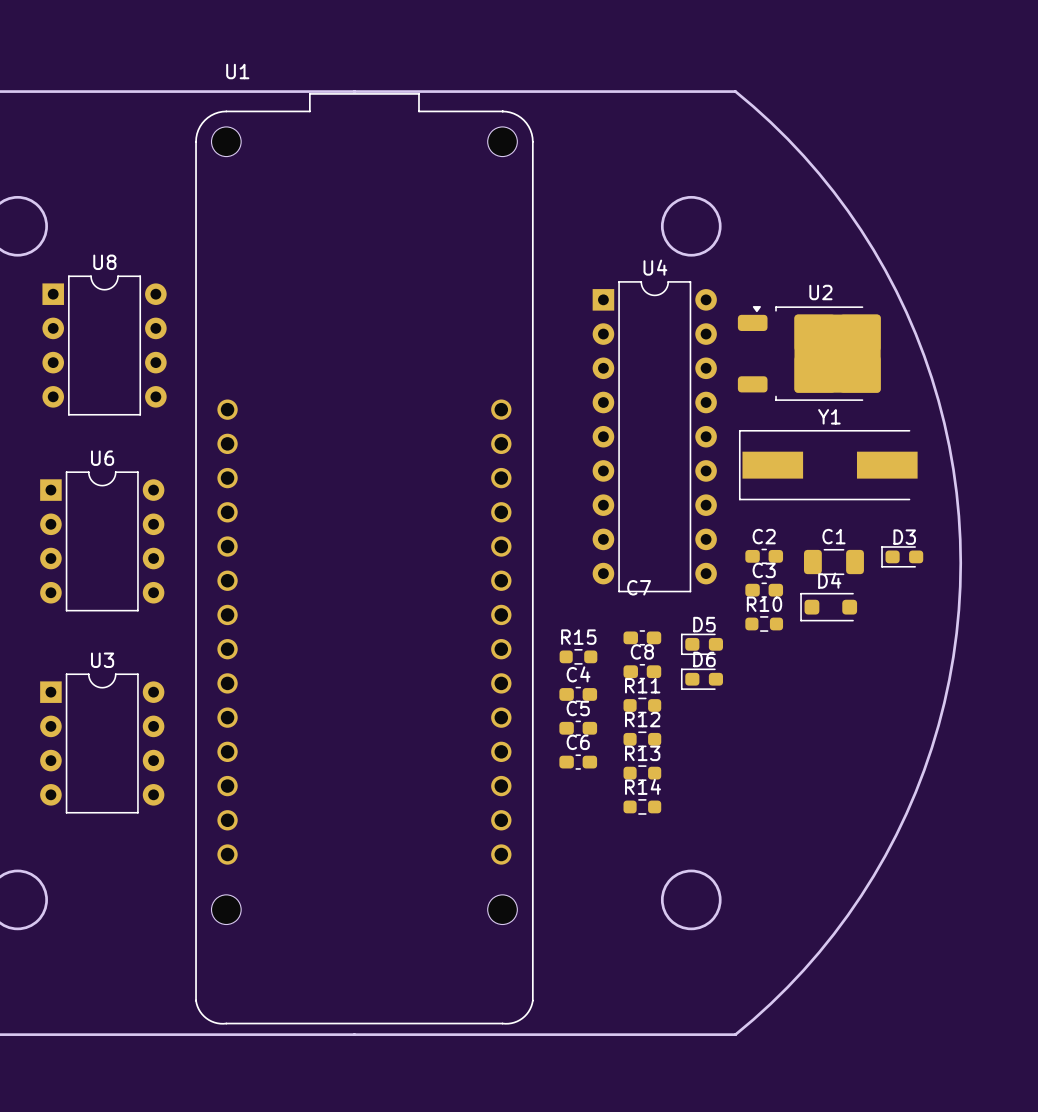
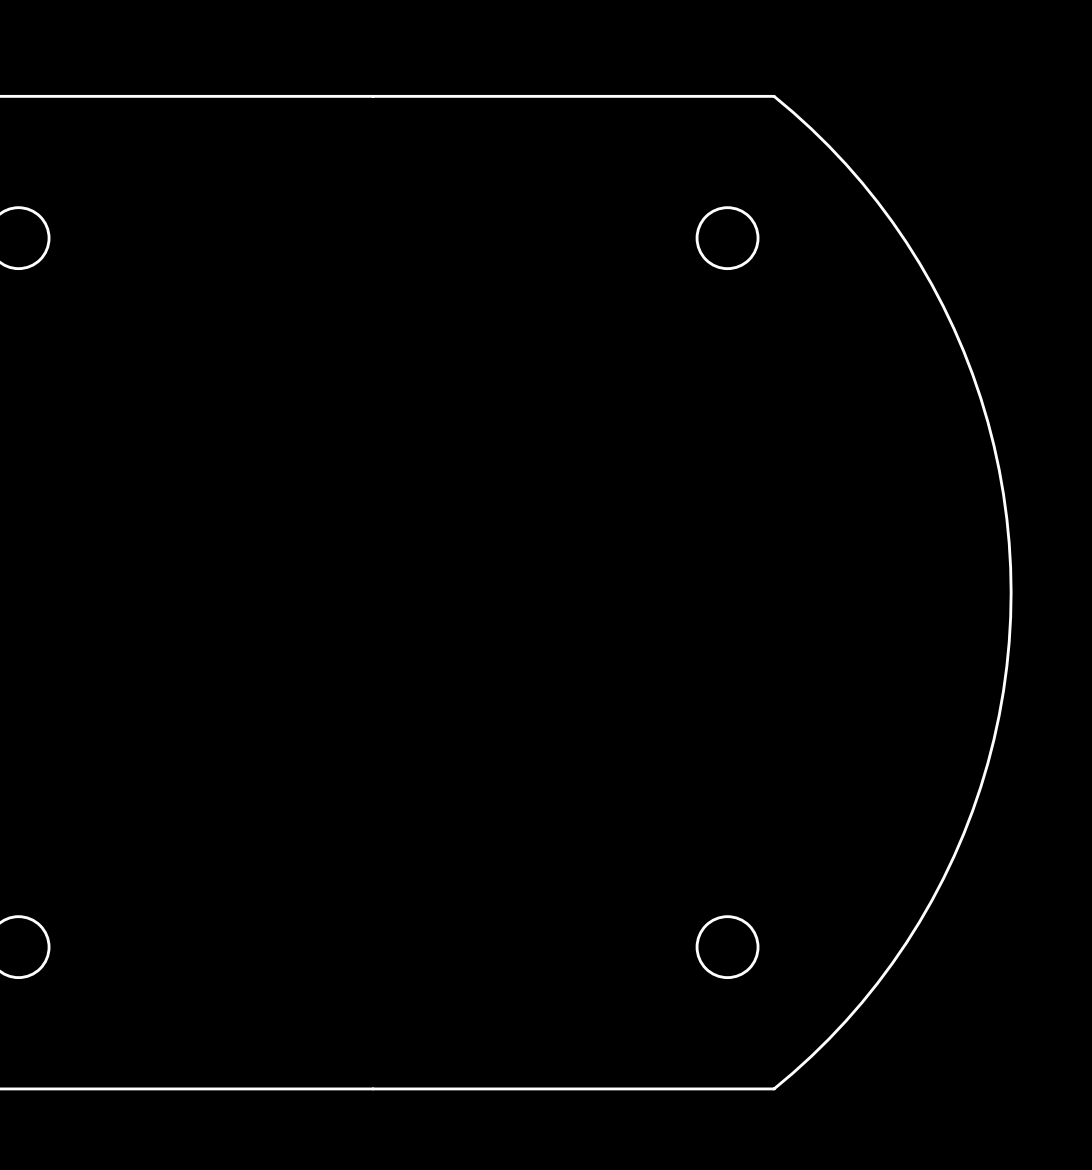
U8: (104, 345) -> none
U2: (809, 353) -> none
U4: (654, 436) -> none
Y1: (828, 465) -> none
U6: (102, 541) -> none
C2: (764, 556) -> none
D3: (902, 556) -> none
U1: (364, 558) -> none
C1: (833, 562) -> none
C3: (764, 590) -> none
D4: (828, 607) -> none
R10: (764, 623) -> none
C7: (642, 637) -> none
D5: (701, 644) -> none
R15: (578, 656) -> none
C8: (642, 671) -> none
D6: (701, 679) -> none
C4: (578, 694) -> none
R11: (642, 705) -> none
C5: (578, 728) -> none
R12: (642, 739) -> none
U3: (102, 743) -> none
C6: (578, 762) -> none
R13: (642, 773) -> none
R14: (642, 806) -> none

